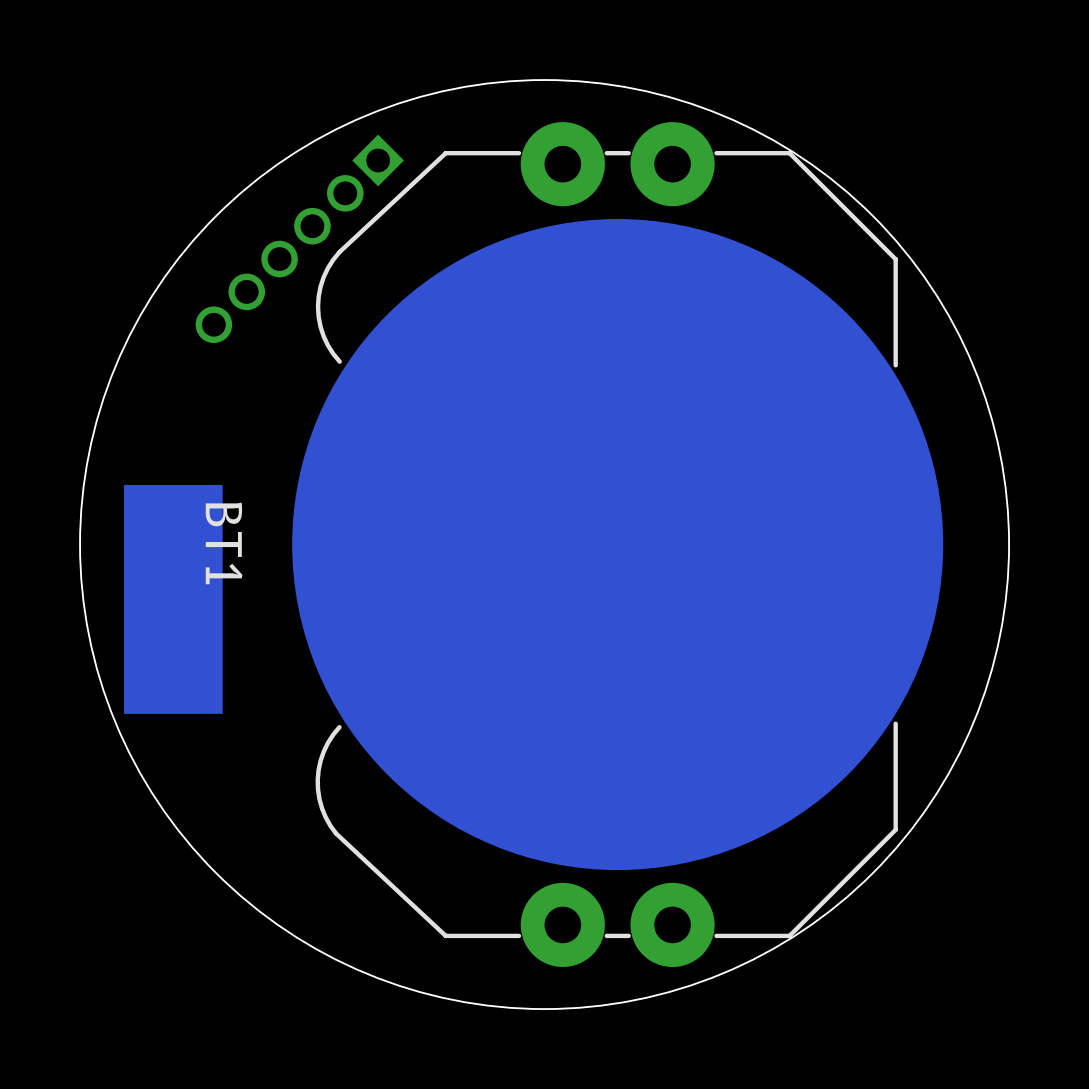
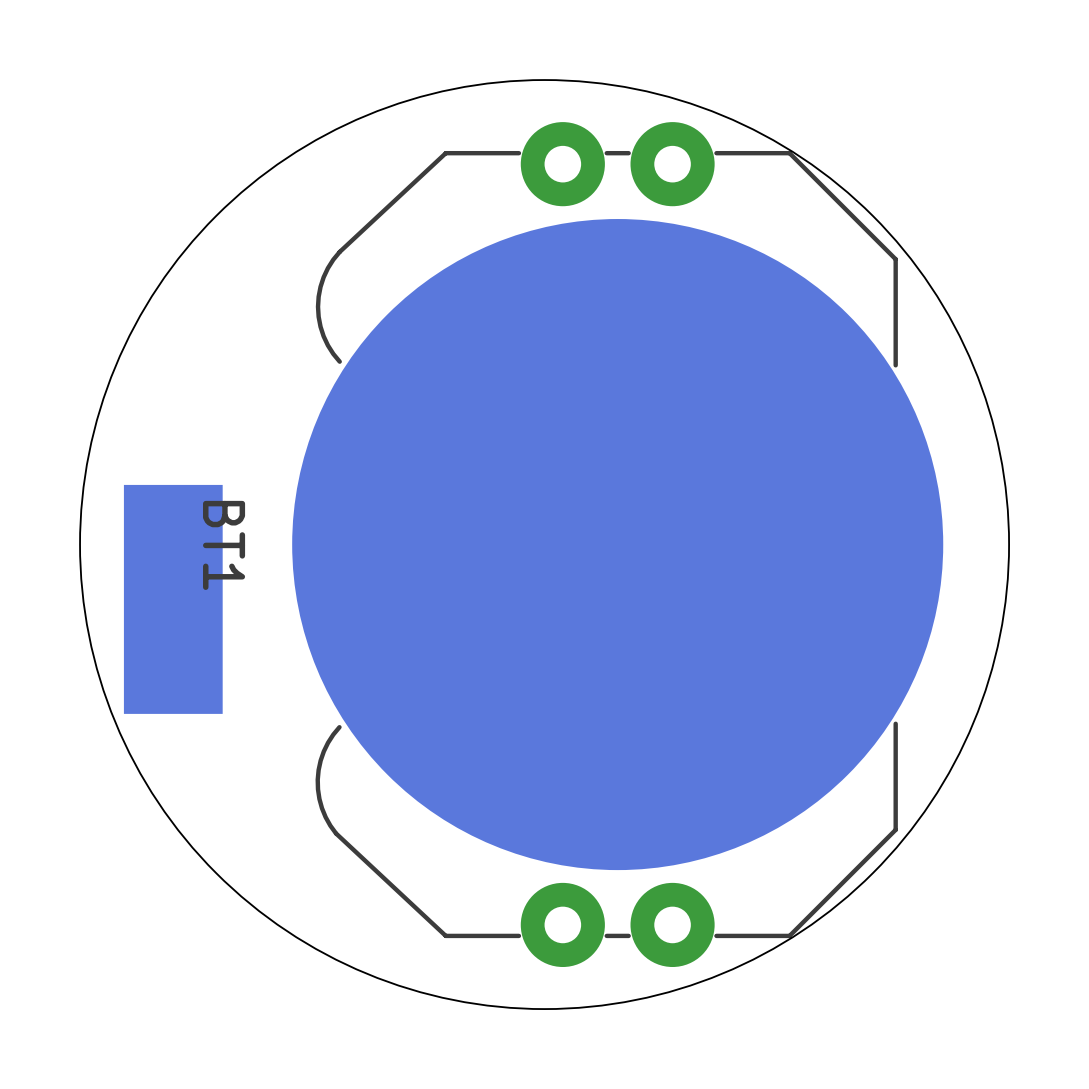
part: (299, 238) -> none

